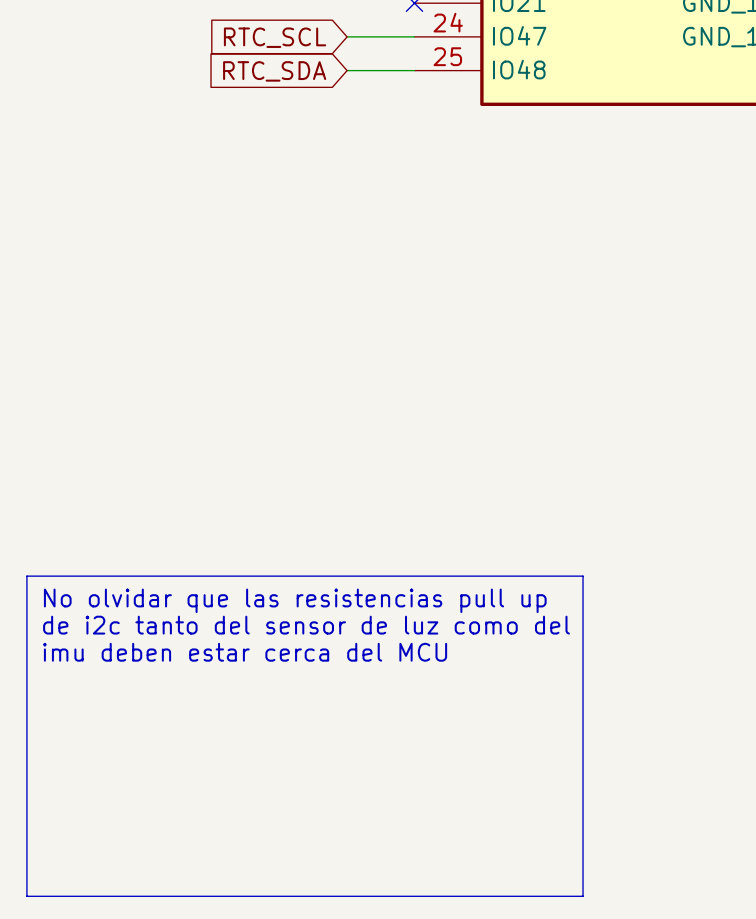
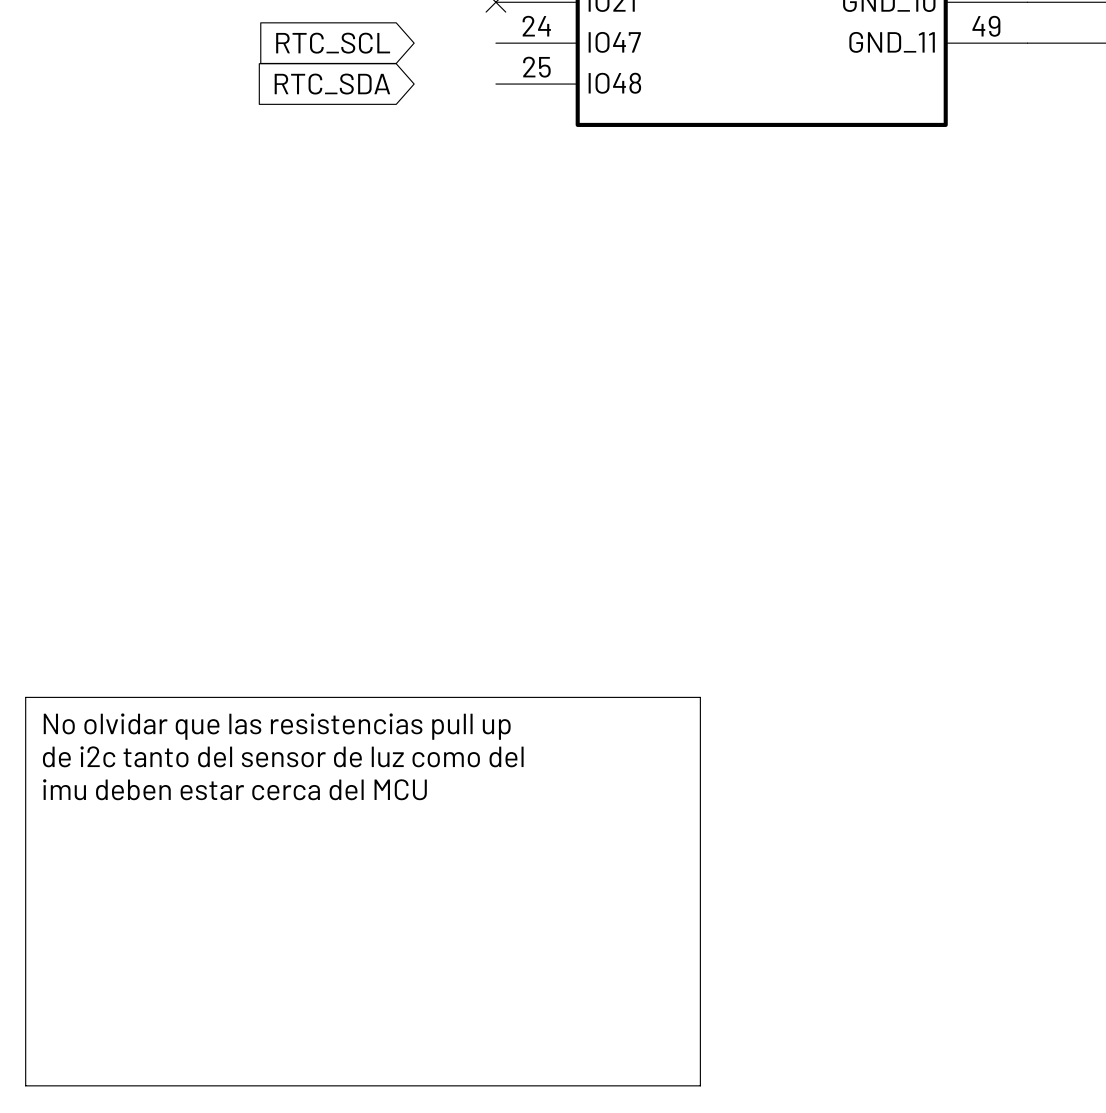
wire: (347, 36) (414, 36) -> none
wire: (347, 70) (414, 70) -> none

